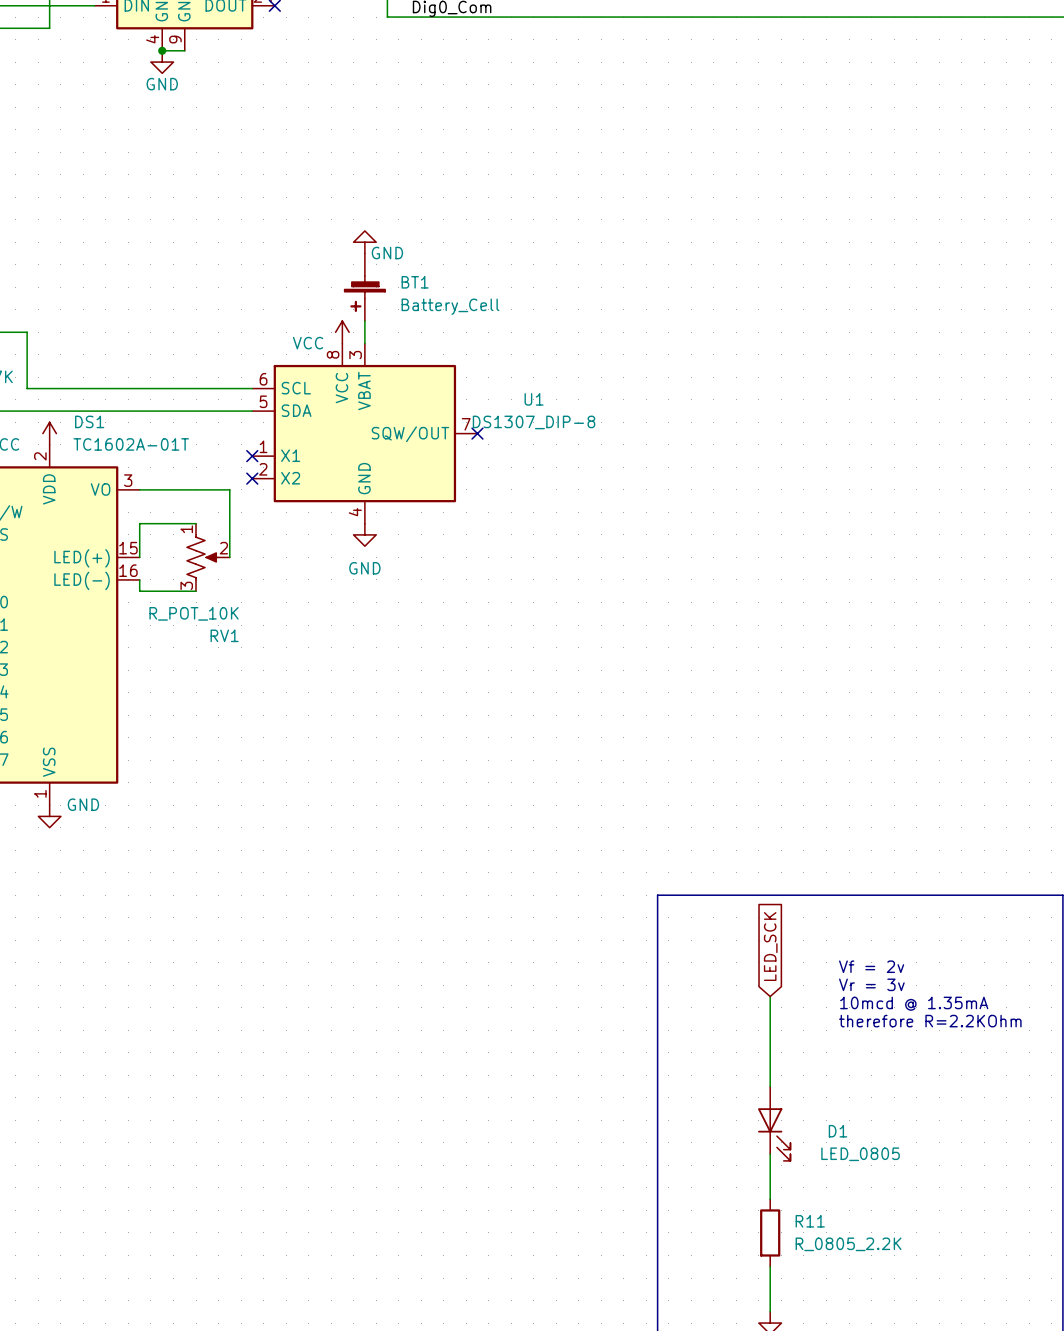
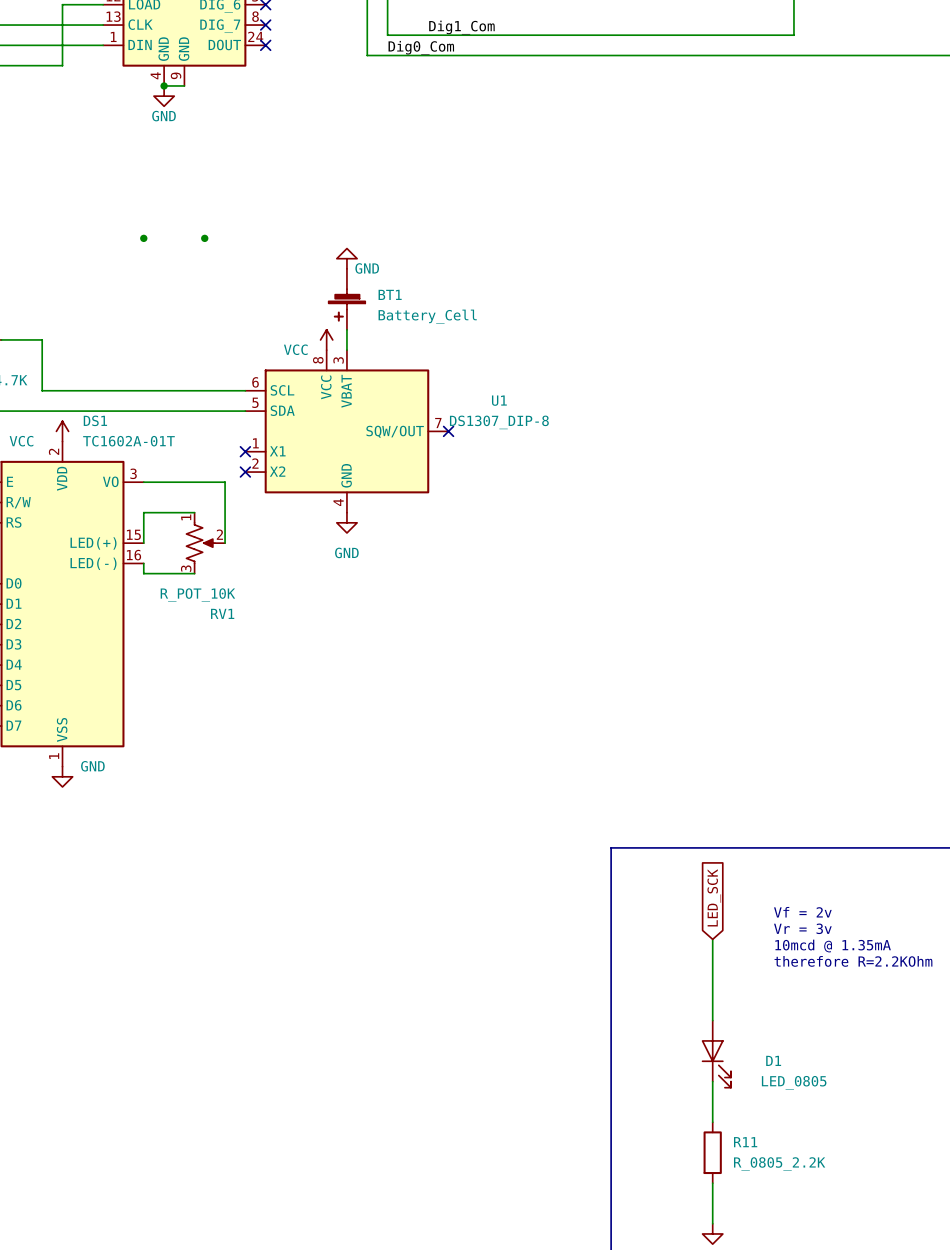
junction: none -> (143, 238)
junction: none -> (204, 238)

